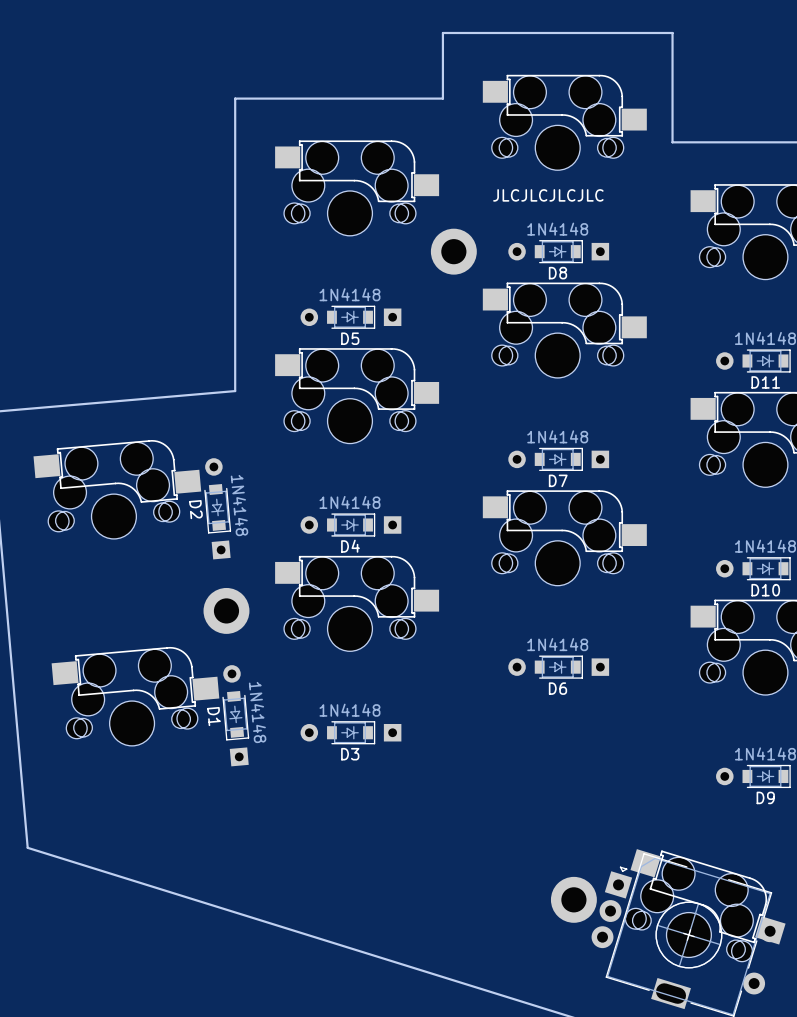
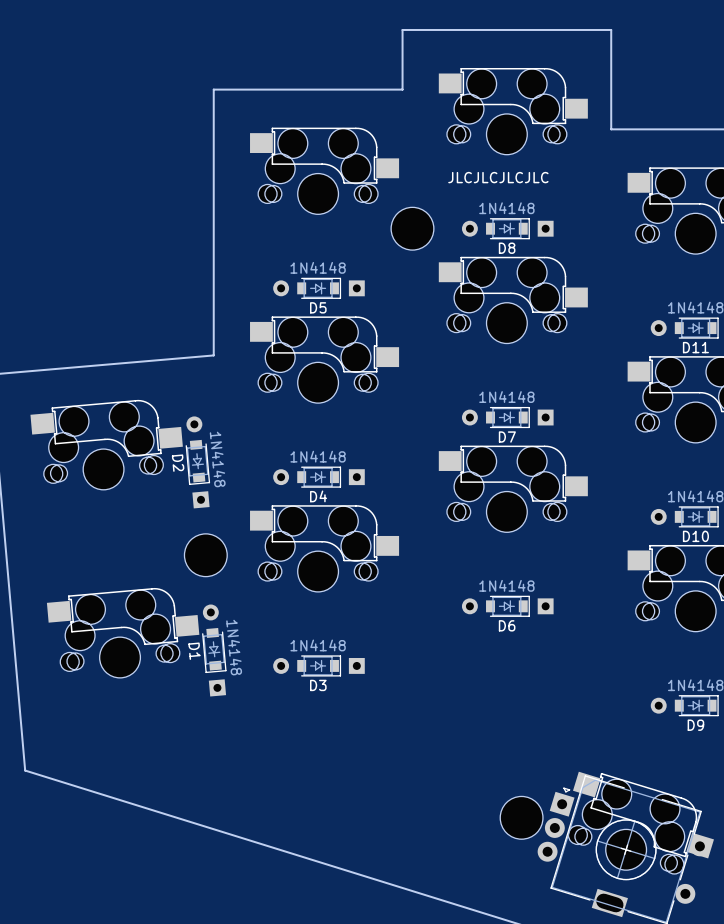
part footprint: [430, 228, 477, 275] -> [391, 207, 434, 251]
part footprint: [203, 587, 250, 634] -> [184, 533, 228, 577]
part footprint: [550, 876, 597, 923] -> [500, 796, 543, 840]

